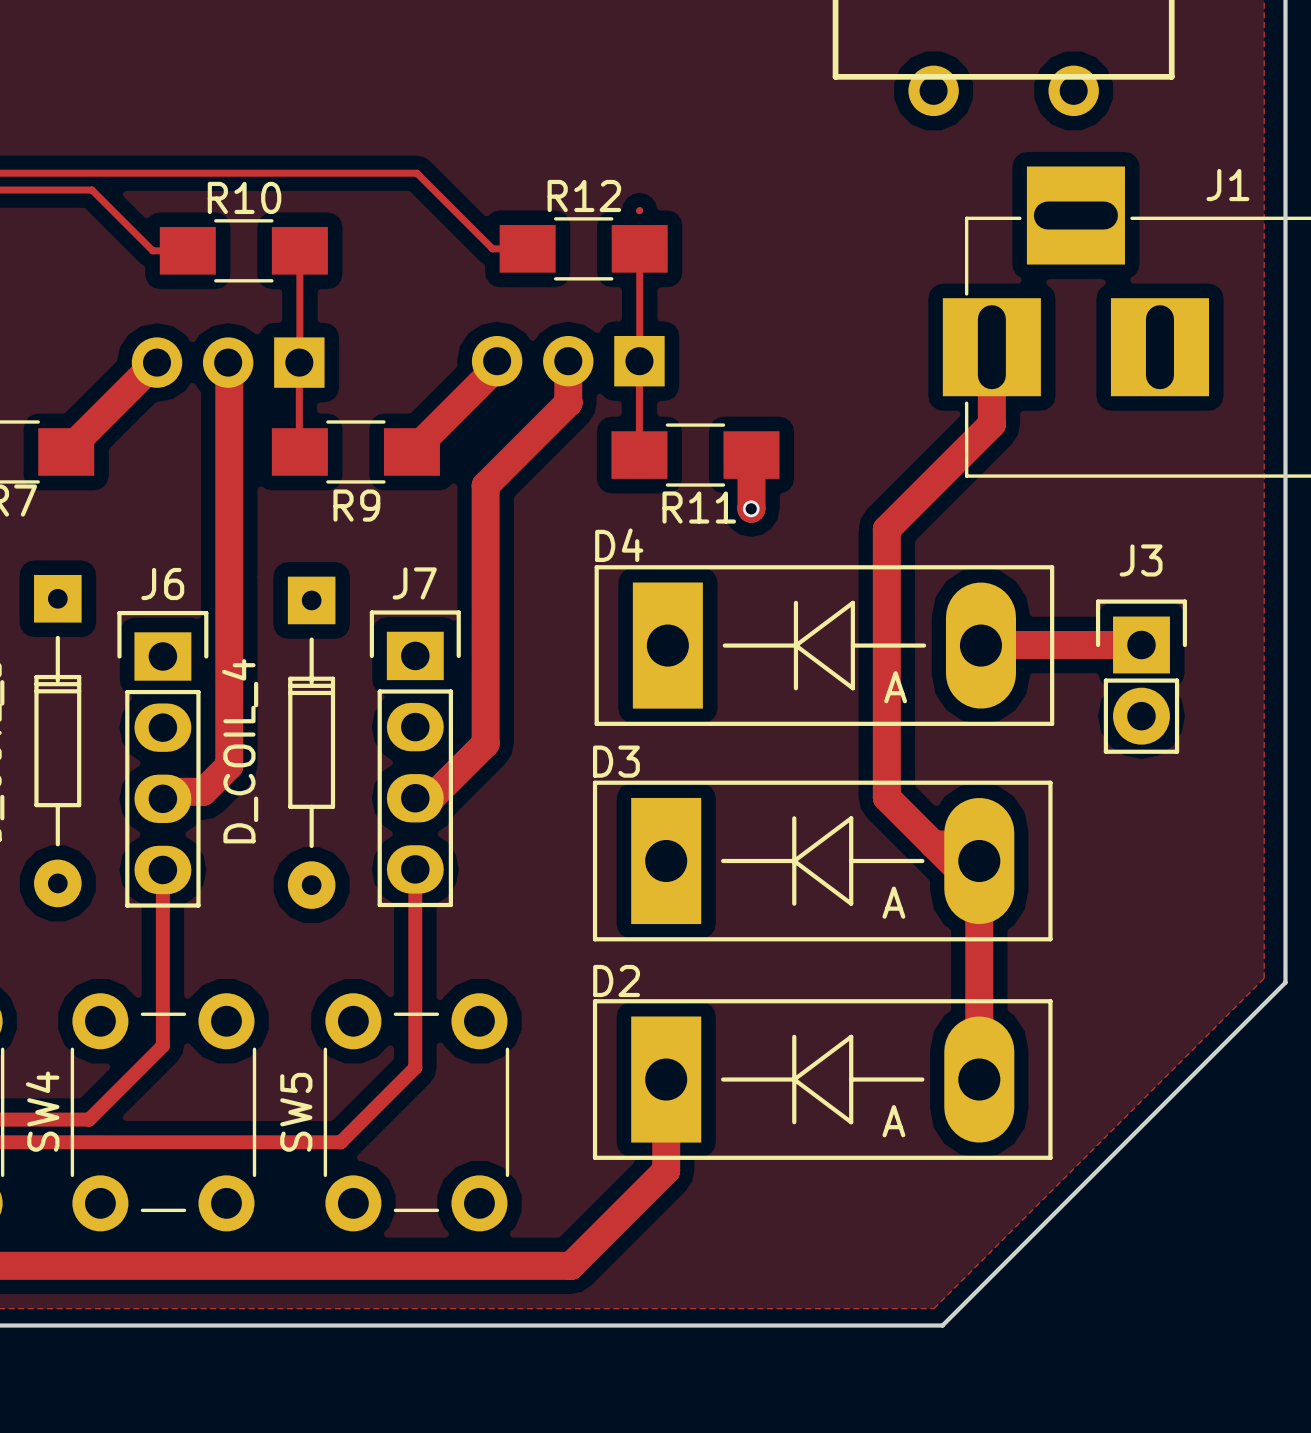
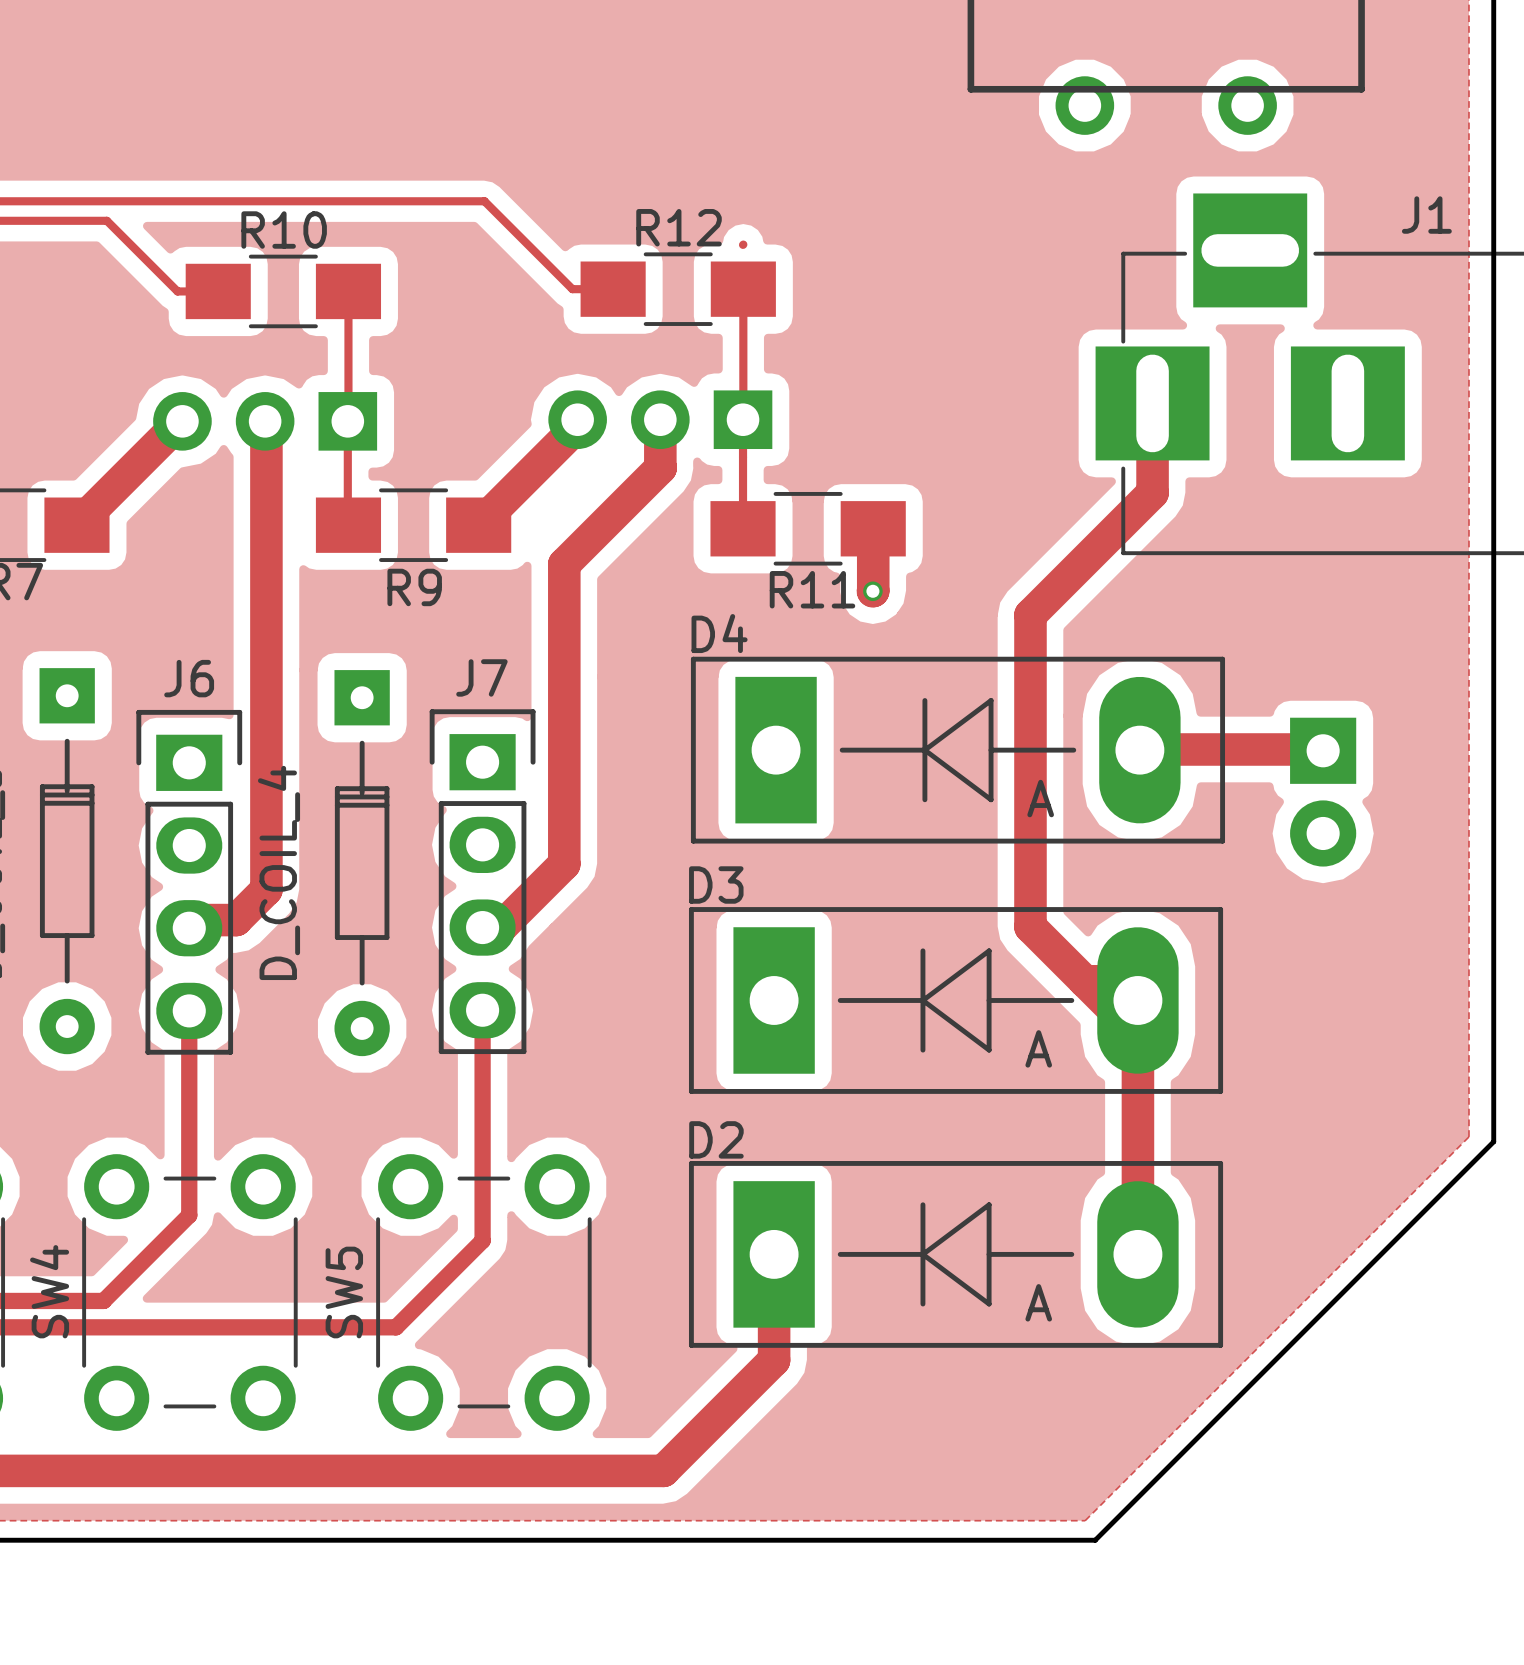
J3 side: top (1141, 676) -> bottom (1323, 792)

